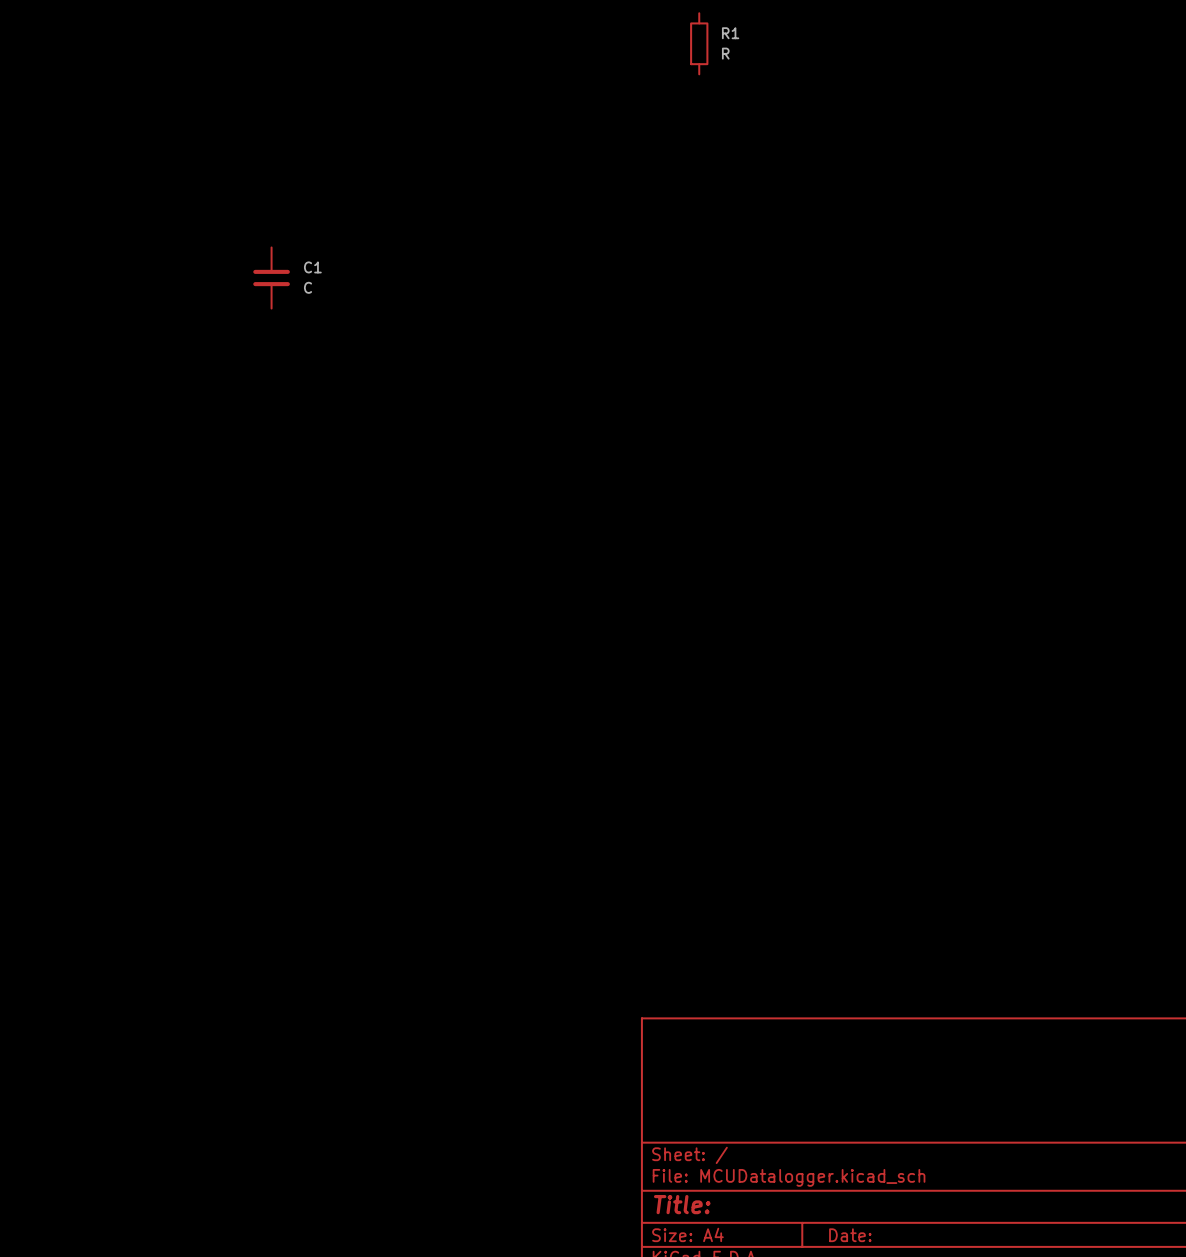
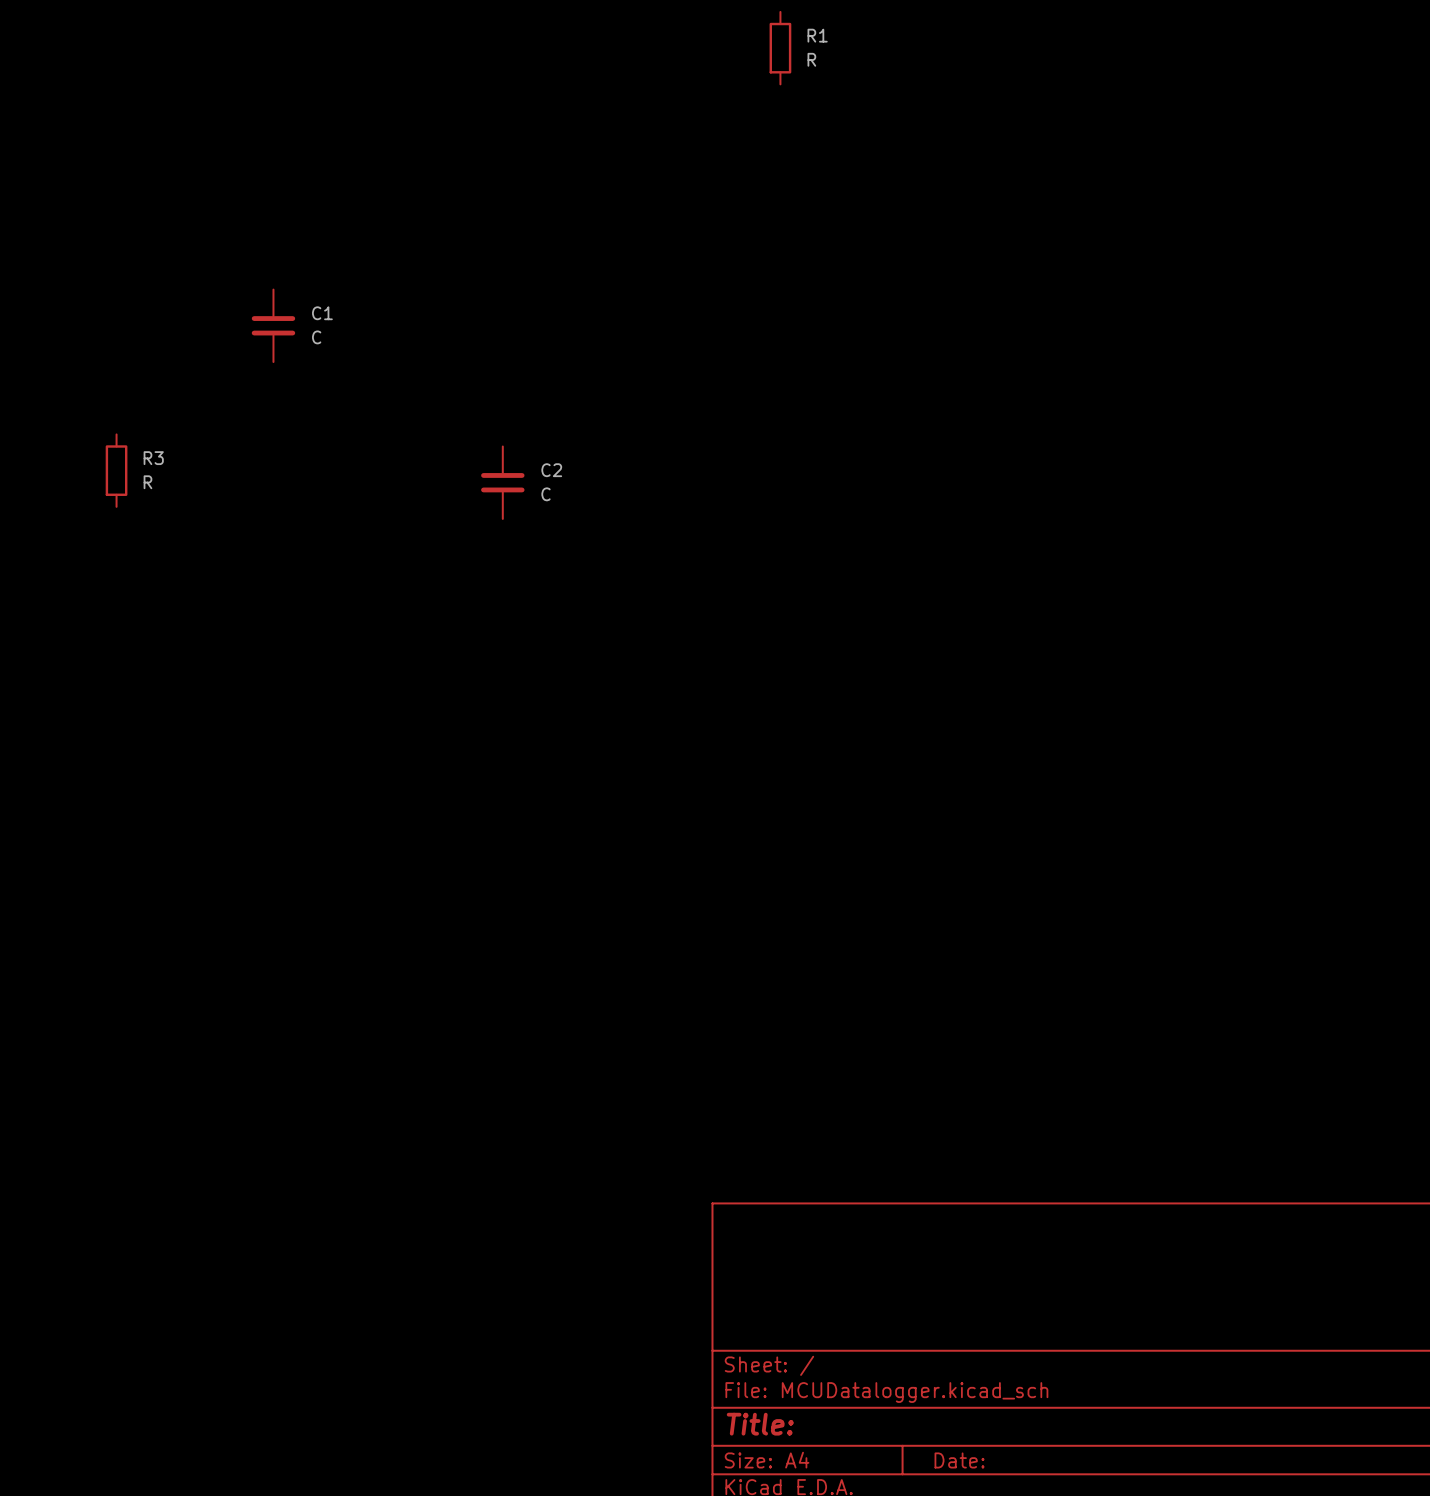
R3: none -> R (116, 470)
C2: none -> C (502, 482)

